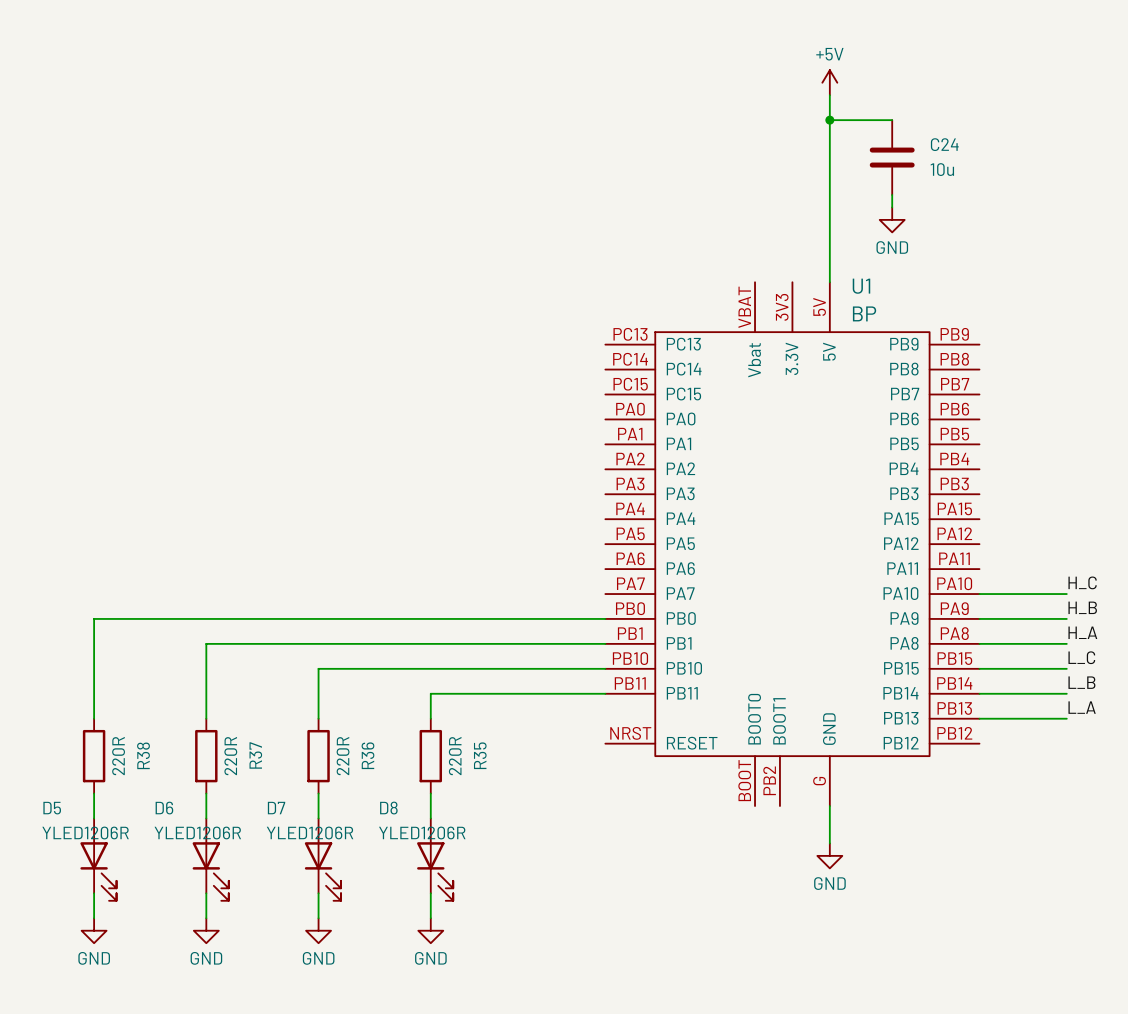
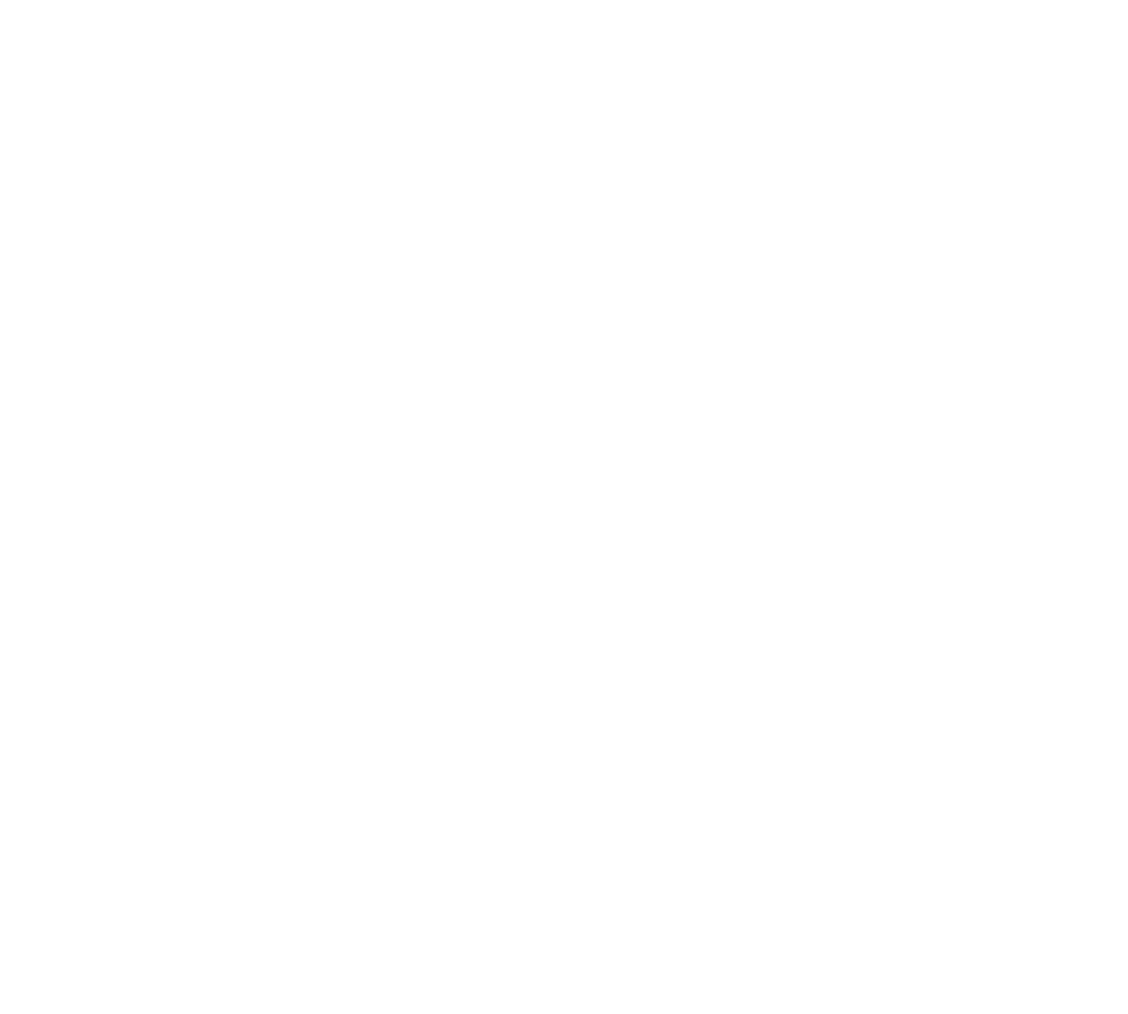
power symbol: +5V (829, 82) -> none
wire: (829, 95) (829, 282) -> none
wire: (829, 120) (892, 120) -> none
junction: (829, 120) -> none
C24: 10u (892, 157) -> none
wire: (892, 194) (892, 207) -> none
power symbol: GND (892, 219) -> none
U1: BP (792, 544) -> none
label: H_C (1082, 582) -> none
wire: (979, 594) (1066, 594) -> none
label: H_B (1082, 607) -> none
wire: (605, 618) (94, 618) (94, 718) -> none
wire: (979, 618) (1066, 618) -> none
label: H_A (1082, 632) -> none
wire: (605, 643) (206, 643) (206, 718) -> none
wire: (979, 643) (1066, 643) -> none
label: L_C (1081, 657) -> none
wire: (605, 668) (318, 668) (318, 718) -> none
wire: (979, 668) (1066, 668) -> none
label: L_B (1081, 682) -> none
wire: (605, 693) (430, 693) (430, 718) -> none
wire: (979, 693) (1066, 693) -> none
label: L_A (1082, 707) -> none
wire: (979, 718) (1066, 718) -> none
R38: 220R (94, 756) -> none
R37: 220R (206, 756) -> none
R36: 220R (318, 756) -> none
R35: 220R (430, 756) -> none
wire: (94, 793) (94, 818) -> none
wire: (206, 793) (206, 818) -> none
wire: (318, 793) (318, 818) -> none
wire: (430, 793) (430, 818) -> none
wire: (829, 806) (829, 843) -> none
power symbol: GND (829, 855) -> none
D5: YLED1206R (98, 859) -> none
D6: YLED1206R (210, 859) -> none
D7: YLED1206R (322, 859) -> none
D8: YLED1206R (435, 859) -> none
wire: (94, 893) (94, 918) -> none
wire: (206, 893) (206, 918) -> none
wire: (318, 893) (318, 918) -> none
wire: (430, 893) (430, 918) -> none
power symbol: GND (94, 930) -> none
power symbol: GND (206, 930) -> none
power symbol: GND (318, 930) -> none
power symbol: GND (430, 930) -> none

